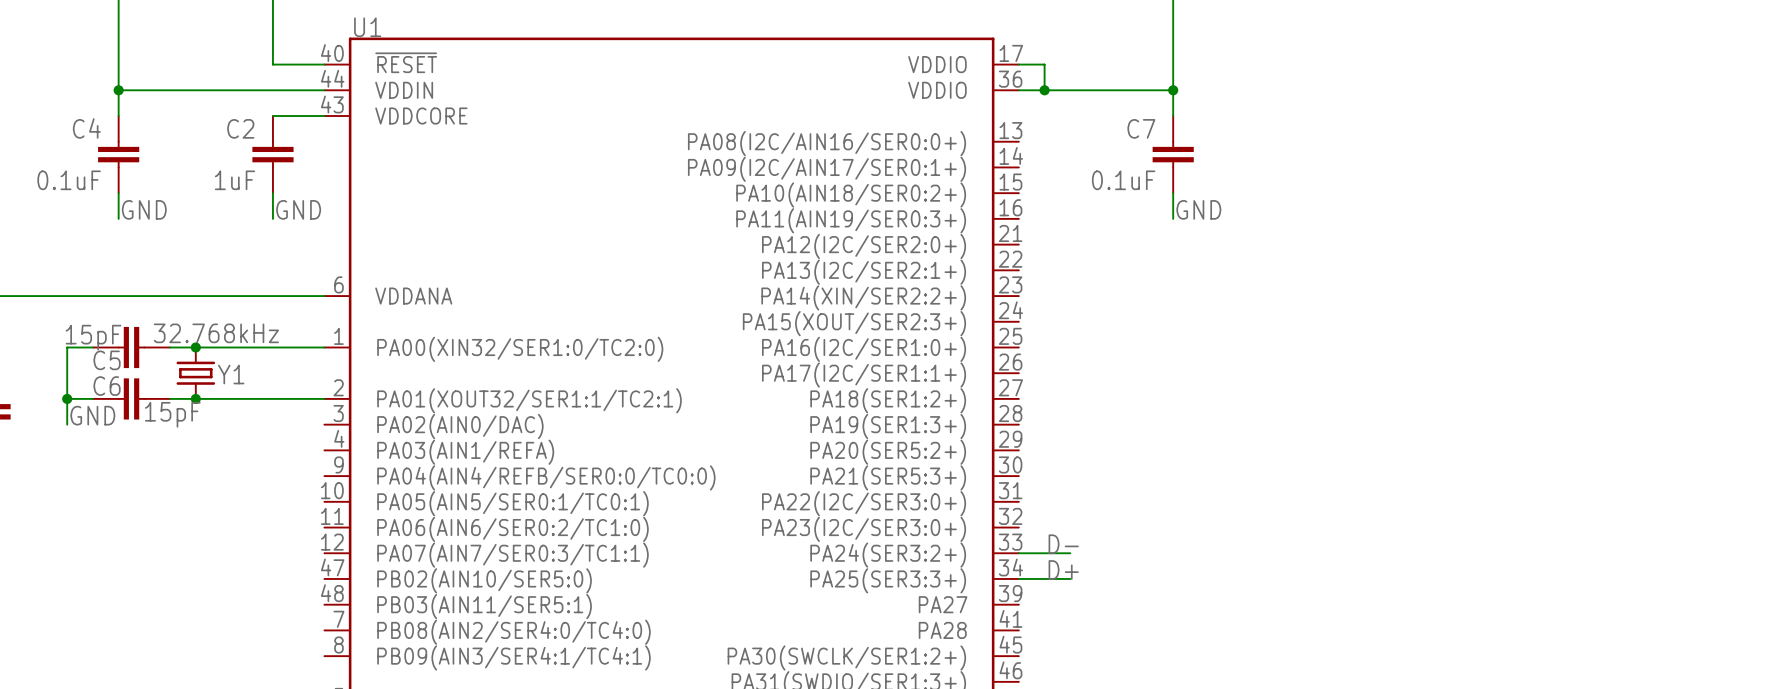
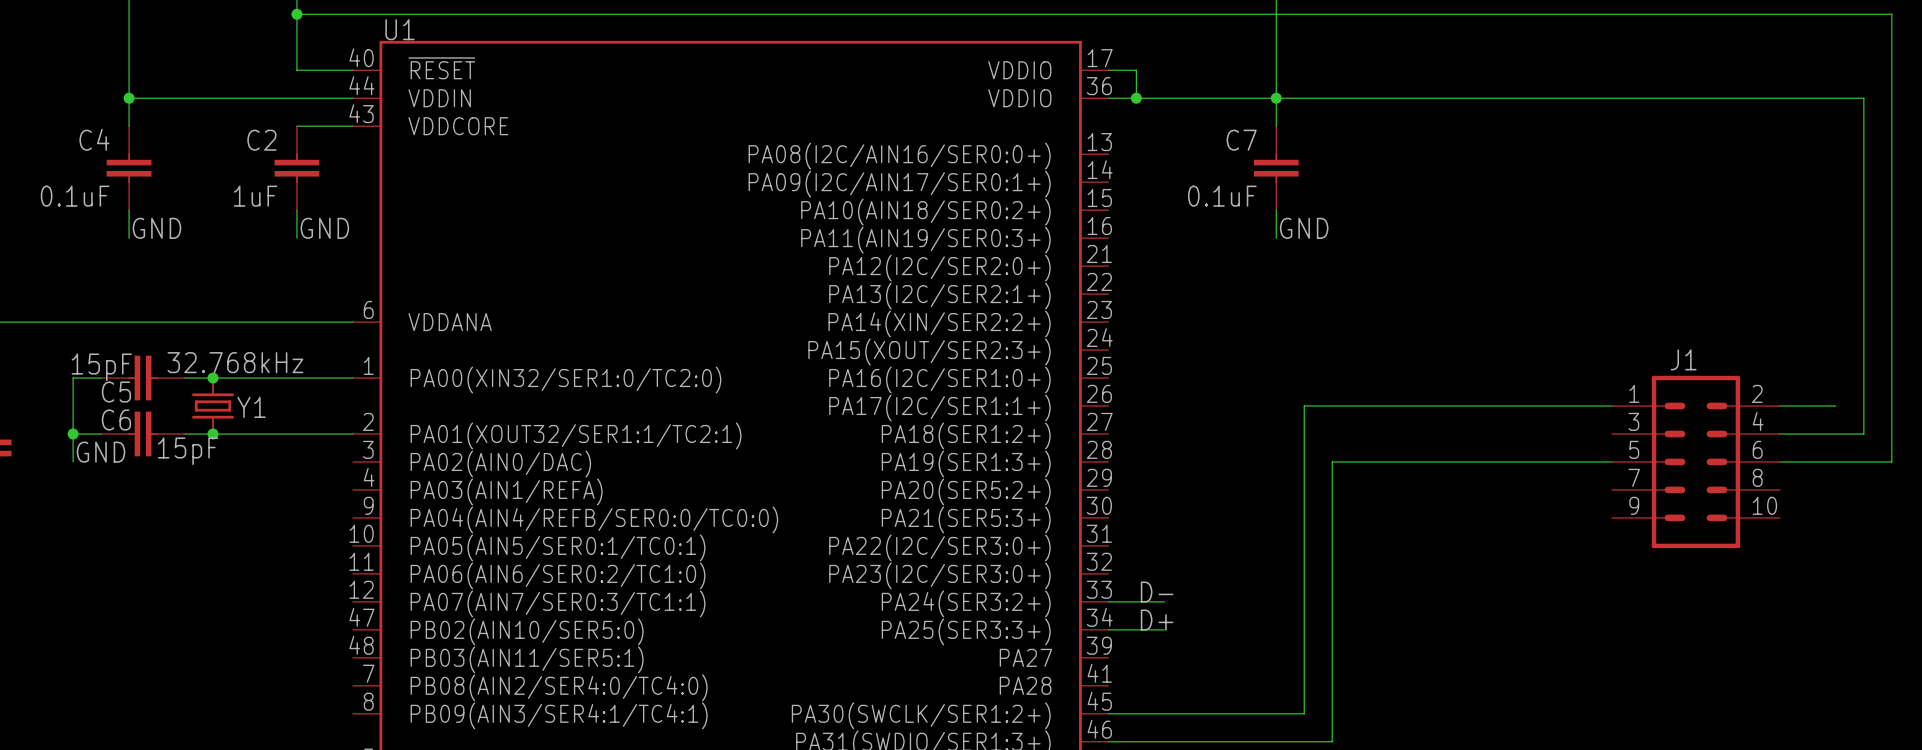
wire: none -> (296, 14) (1891, 14) (1891, 461) (1779, 461)
junction: none -> (296, 14)
wire: none -> (1276, 98) (1863, 98) (1863, 433) (1779, 433)
wire: none -> (1612, 406) (1304, 406) (1304, 713) (1108, 713)
wire: none -> (1779, 406) (1835, 406)
wire: none -> (1612, 461) (1332, 461) (1332, 741) (1108, 741)
J1: none -> (1695, 461)

